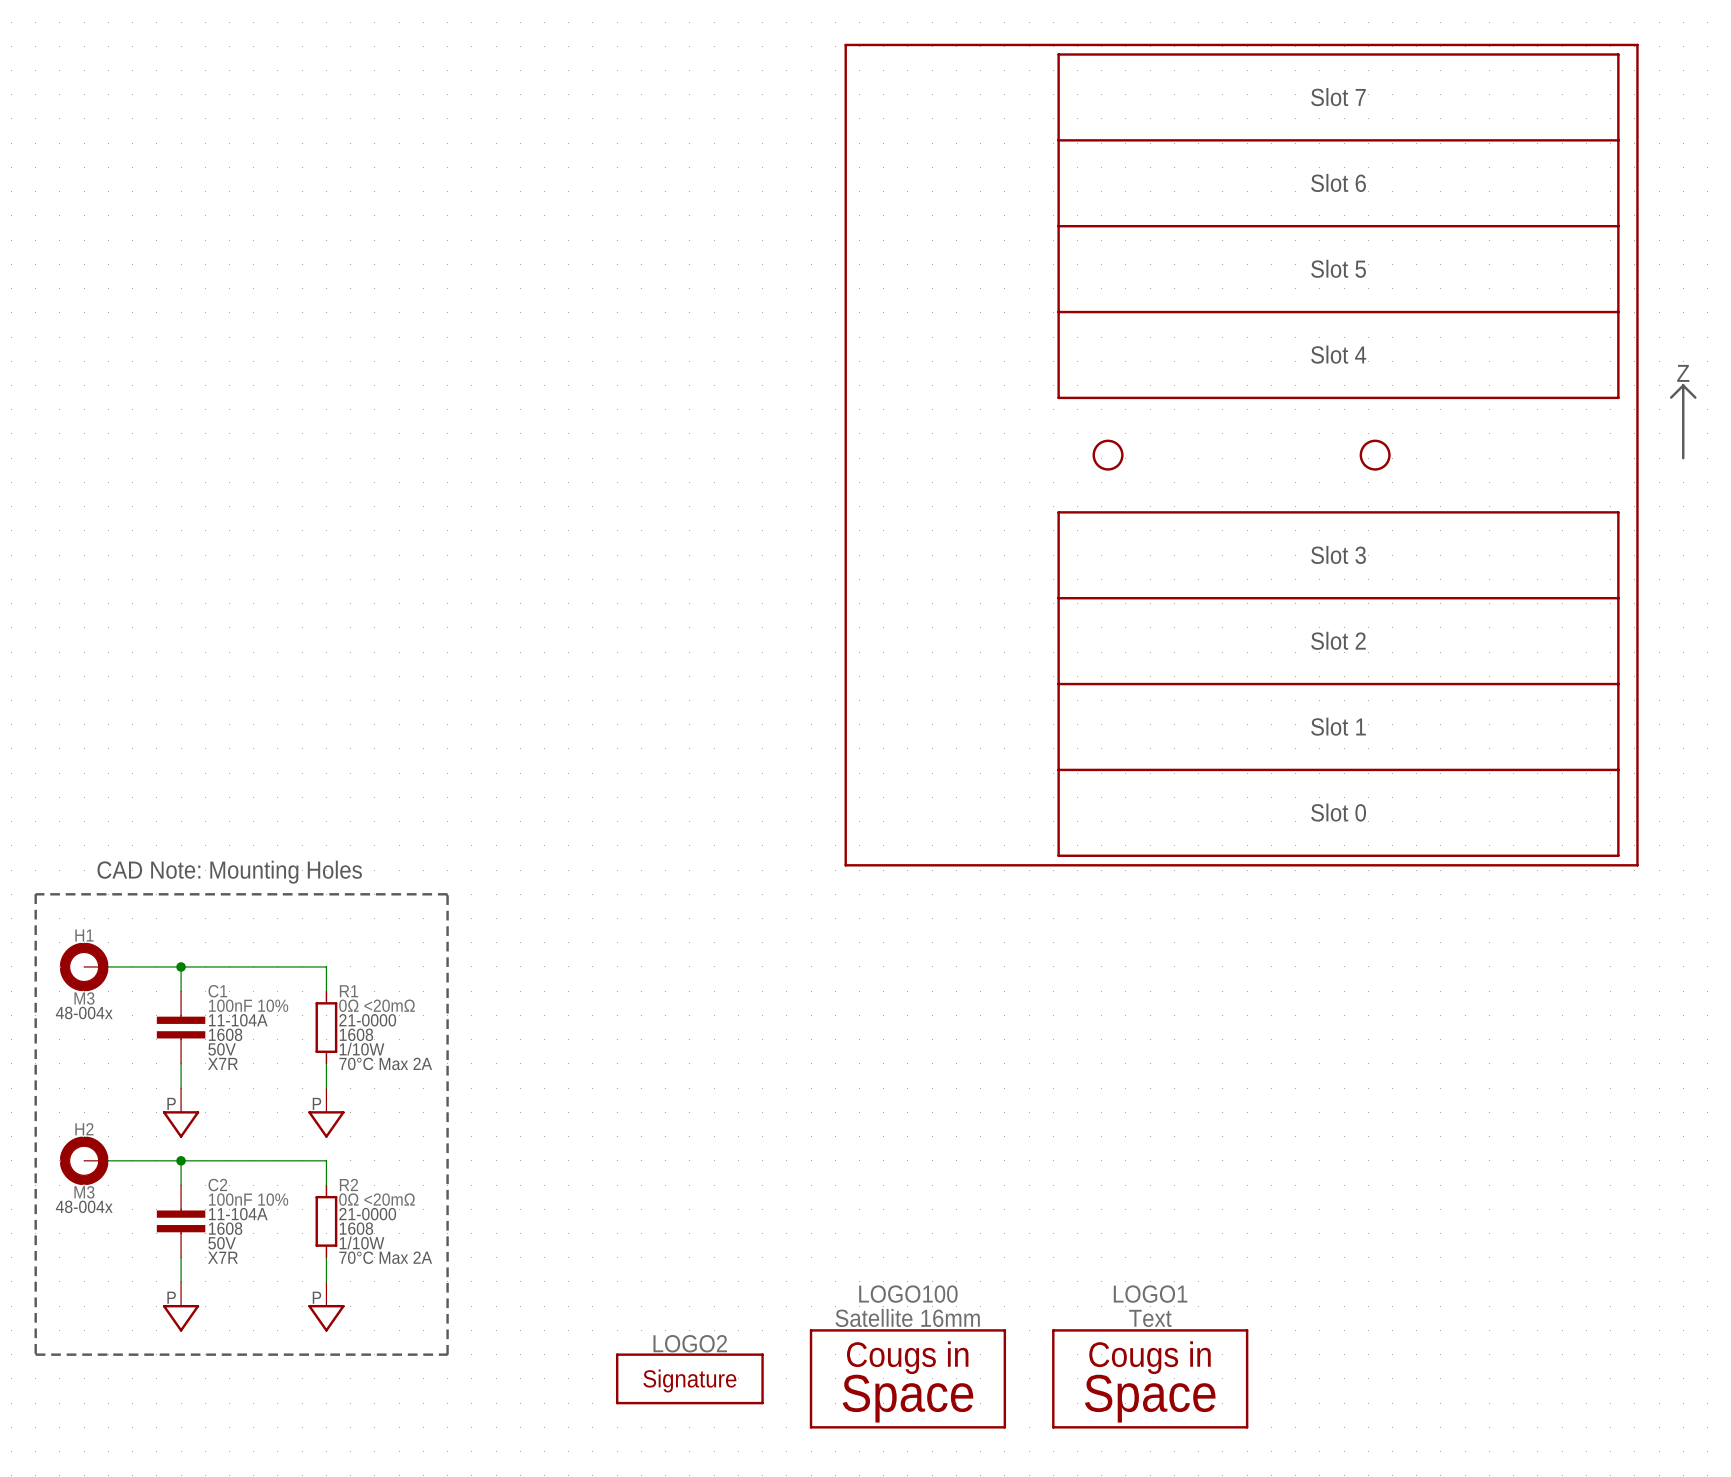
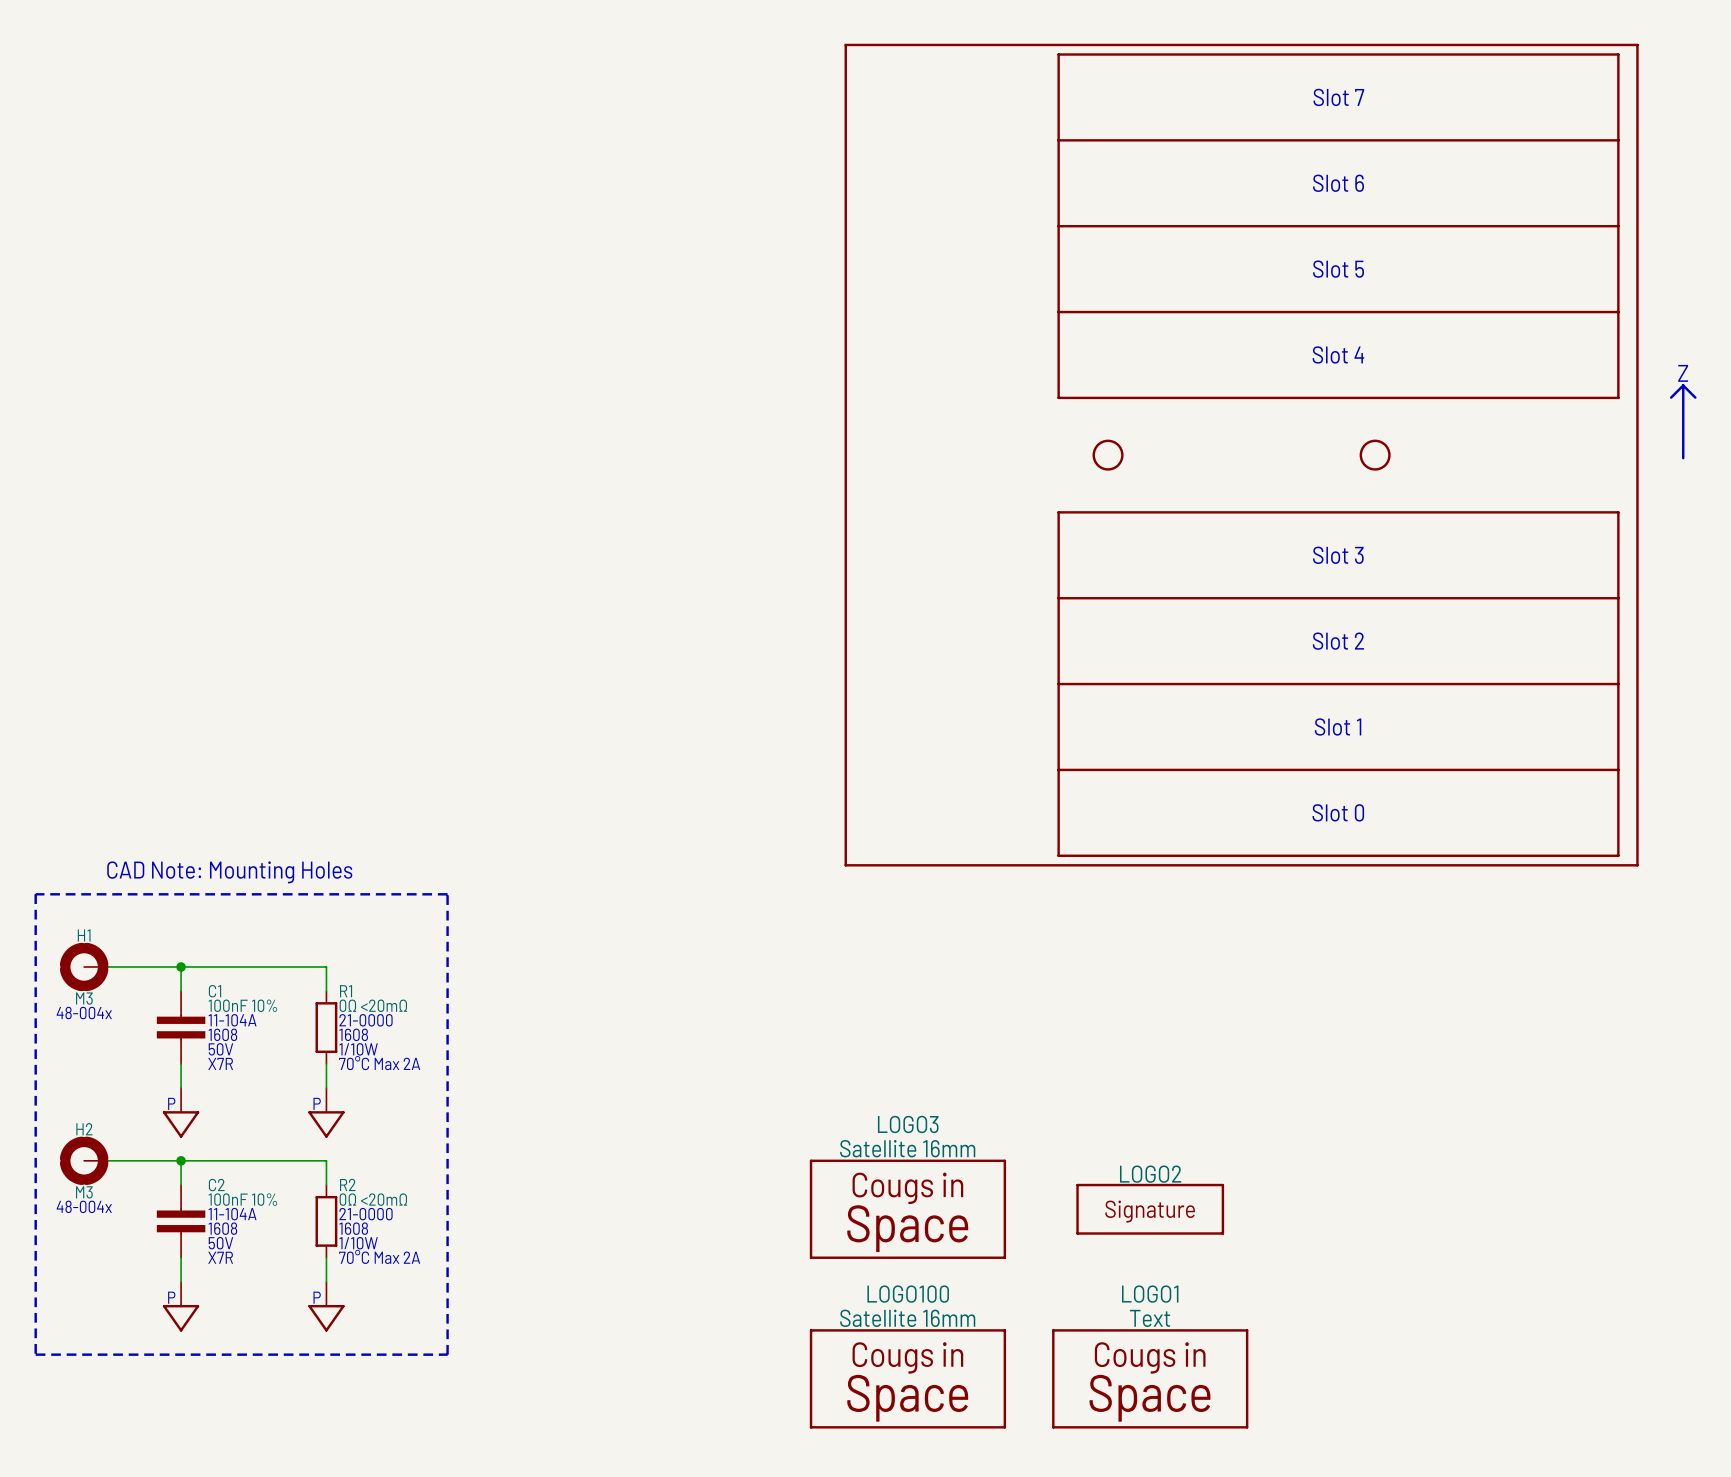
LOGO3: none -> Satellite 16mm (907, 1209)
LOGO2 position: (689, 1378) -> (1150, 1209)

